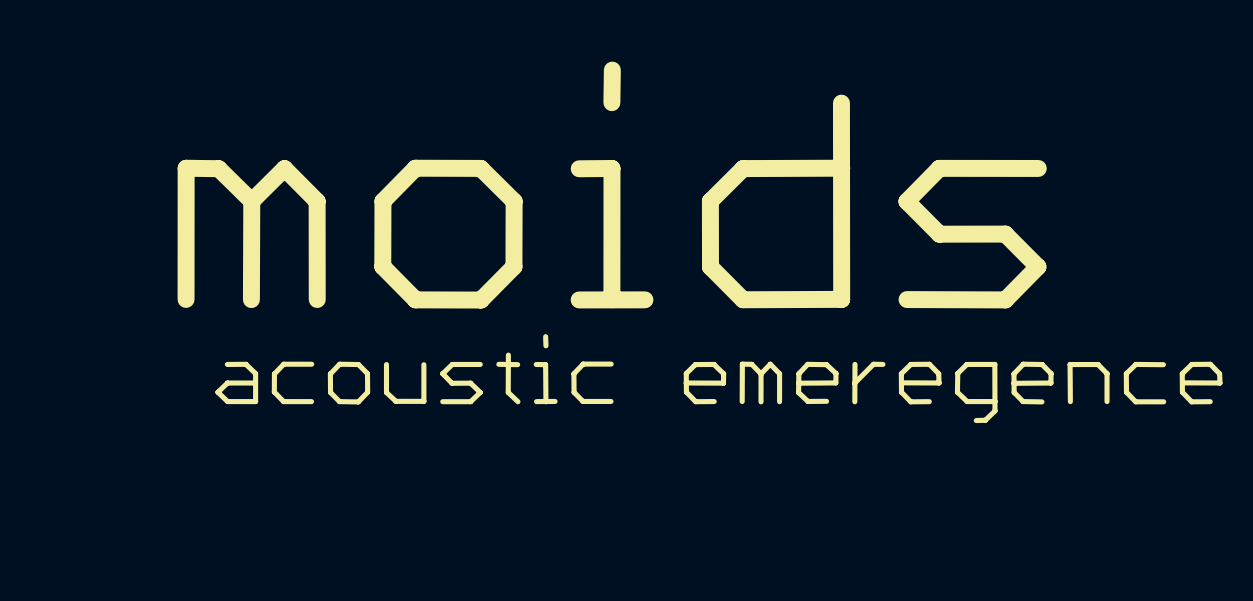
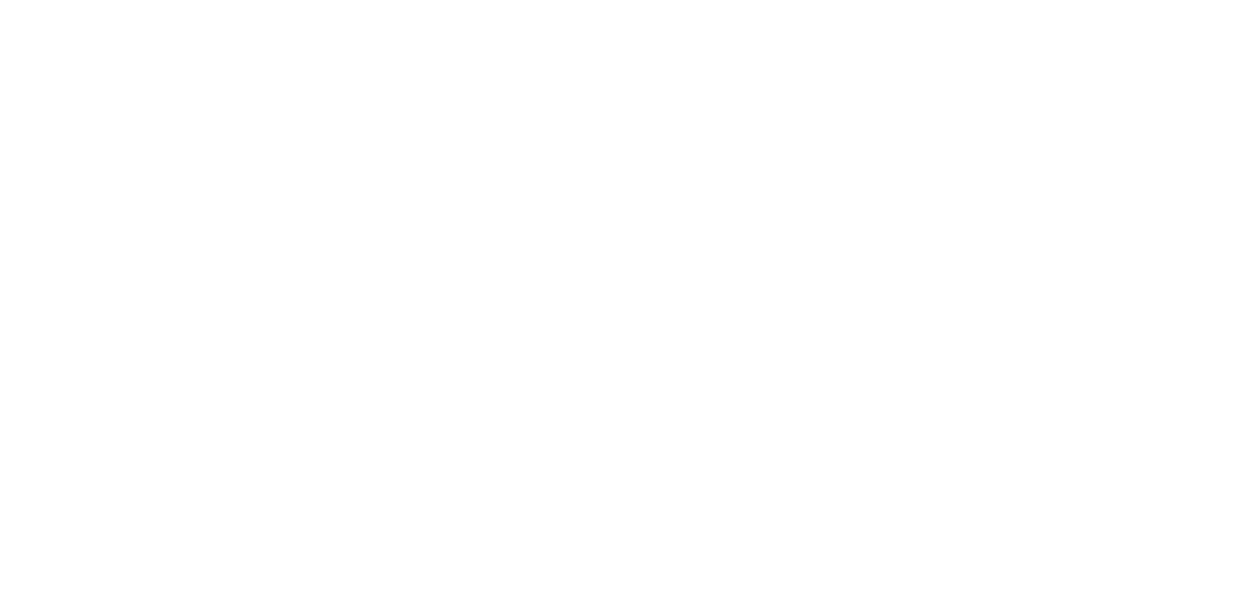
line: (612, 70) (611, 102) -> none
line: (841, 103) (841, 299) (743, 299) (710, 266) (710, 201) (743, 168) (841, 168) -> none
line: (415, 168) (480, 168) (514, 201) (513, 266) (480, 300) (415, 299) (382, 266) (382, 201) (415, 168) -> none
line: (579, 168) (611, 168) (611, 299) -> none
line: (1038, 168) (939, 168) (906, 201) (939, 234) (1005, 234) (1037, 266) (1005, 299) (907, 299) -> none
line: (251, 201) (284, 168) (317, 201) (317, 299) -> none
line: (251, 201) (218, 168) (186, 168) (186, 299) -> none
line: (251, 201) (251, 299) -> none
line: (644, 299) (579, 299) -> none
line: (545, 336) (545, 345) -> none
line: (508, 355) (508, 392) (517, 401) -> none
line: (227, 364) (245, 364) (255, 373) (255, 401) (227, 401) (217, 392) (227, 383) (255, 383) -> none
line: (311, 364) (283, 364) (274, 373) (274, 392) (283, 401) (311, 401) -> none
line: (339, 364) (330, 373) (330, 392) (339, 401) (358, 401) (367, 392) (367, 373) (358, 364) (339, 364) -> none
line: (386, 364) (386, 392) (395, 401) (423, 401) (423, 364) -> none
line: (480, 364) (452, 364) (442, 373) (451, 383) (470, 383) (480, 392) (470, 401) (442, 401) -> none
line: (498, 364) (517, 364) -> none
line: (536, 364) (545, 364) (545, 401) -> none
line: (611, 364) (583, 364) (573, 373) (574, 392) (583, 401) (611, 401) -> none
line: (854, 364) (854, 401) -> none
line: (882, 364) (873, 364) (854, 383) -> none
line: (1163, 364) (1135, 364) (1126, 373) (1126, 392) (1135, 401) (1163, 401) -> none
line: (761, 373) (770, 364) (779, 373) (779, 401) -> none
line: (761, 373) (751, 364) (742, 364) (742, 401) -> none
line: (761, 373) (761, 401) -> none
line: (686, 382) (723, 383) (723, 373) (713, 364) (695, 364) (686, 373) (686, 392) (695, 401) (714, 401) -> none
line: (901, 382) (939, 382) (938, 373) (929, 364) (910, 364) (901, 373) (901, 392) (910, 401) (929, 401) -> none
line: (1182, 382) (1219, 383) (1219, 373) (1210, 364) (1191, 364) (1182, 373) (1182, 392) (1191, 401) (1210, 401) -> none
line: (798, 383) (835, 382) (836, 373) (826, 364) (807, 364) (798, 373) (798, 392) (808, 401) (826, 401) -> none
line: (1013, 383) (1050, 383) (1051, 373) (1042, 364) (1023, 364) (1013, 373) (1014, 392) (1023, 401) (1041, 401) -> none
line: (555, 401) (536, 401) -> none
line: (995, 401) (967, 401) (957, 392) (957, 373) (966, 364) (994, 364) (994, 410) (985, 420) (976, 420) -> none
line: (1107, 401) (1107, 373) (1098, 364) (1070, 364) (1070, 401) -> none

